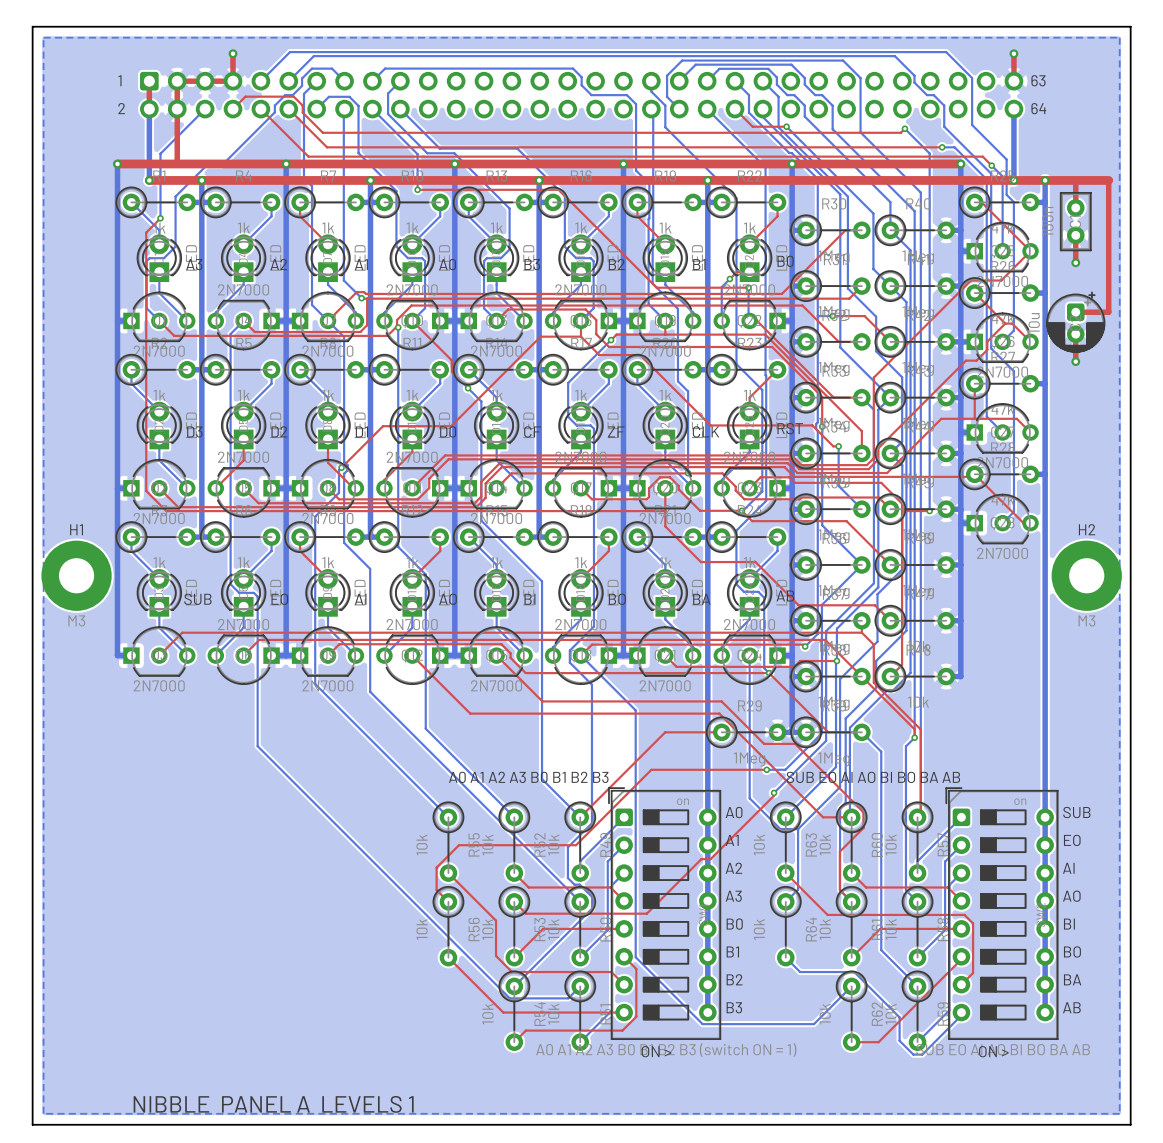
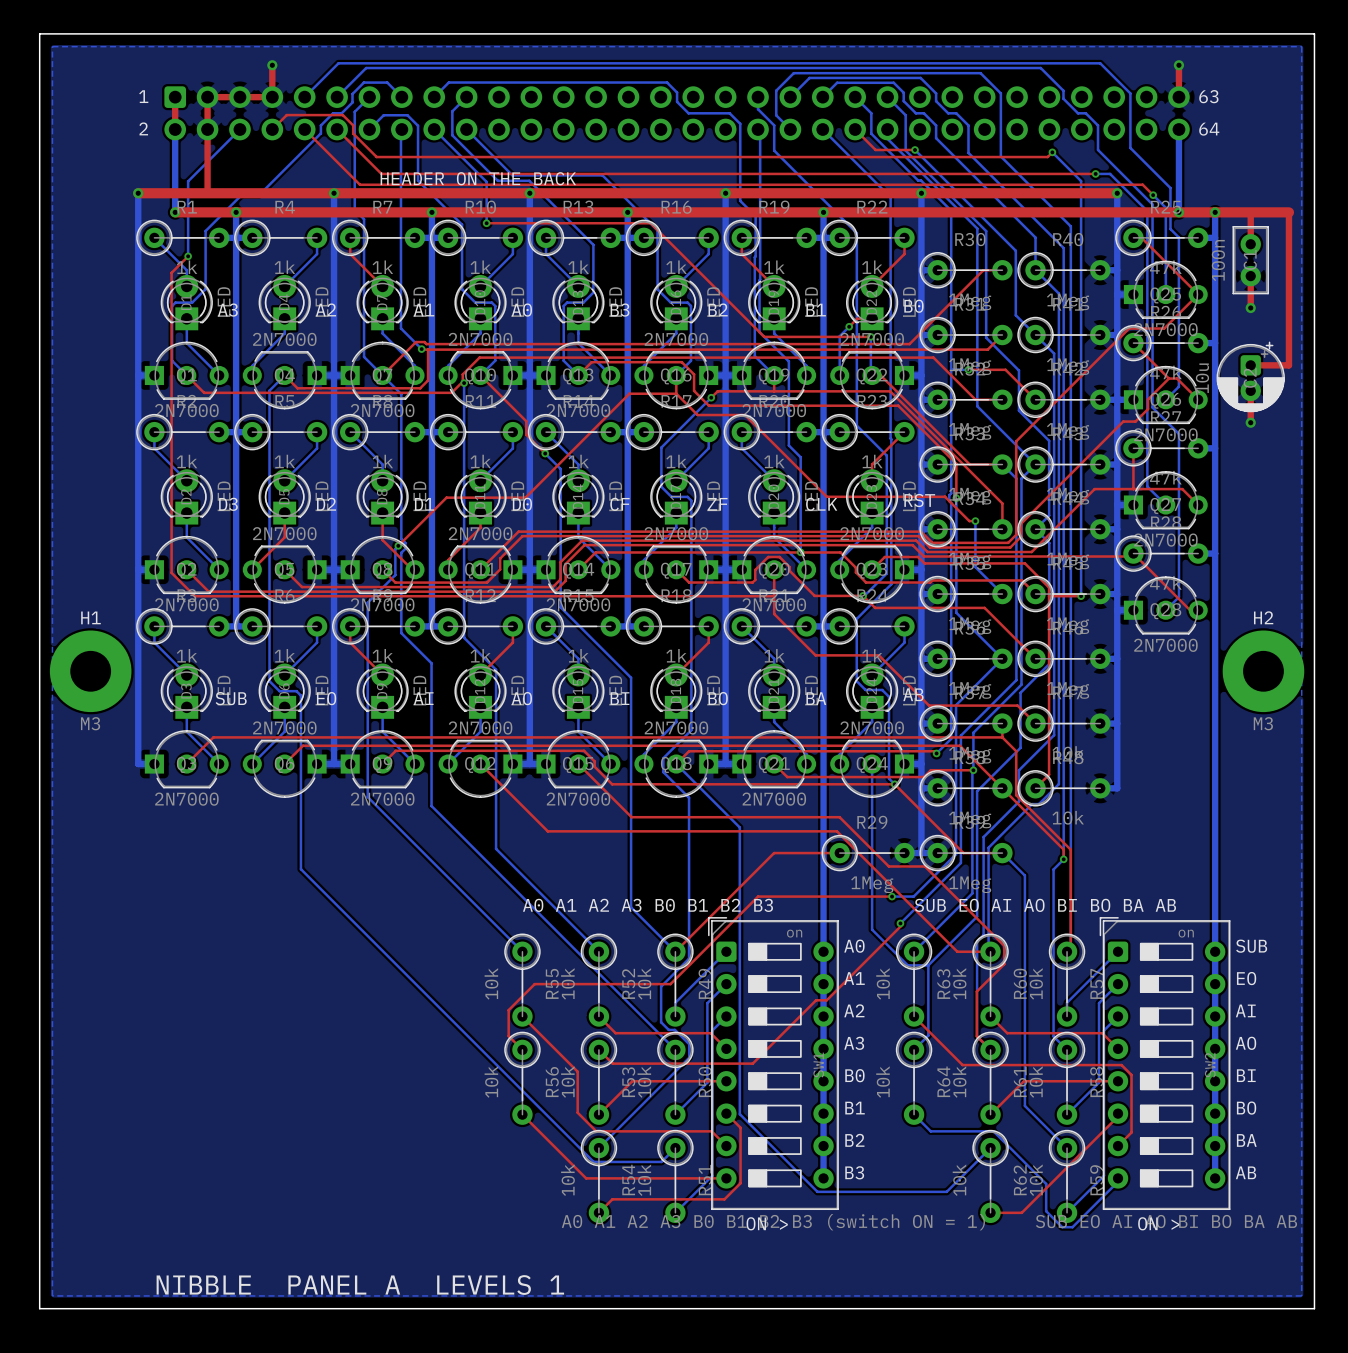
text: none -> HEADER ON THE BACK (478, 178)

